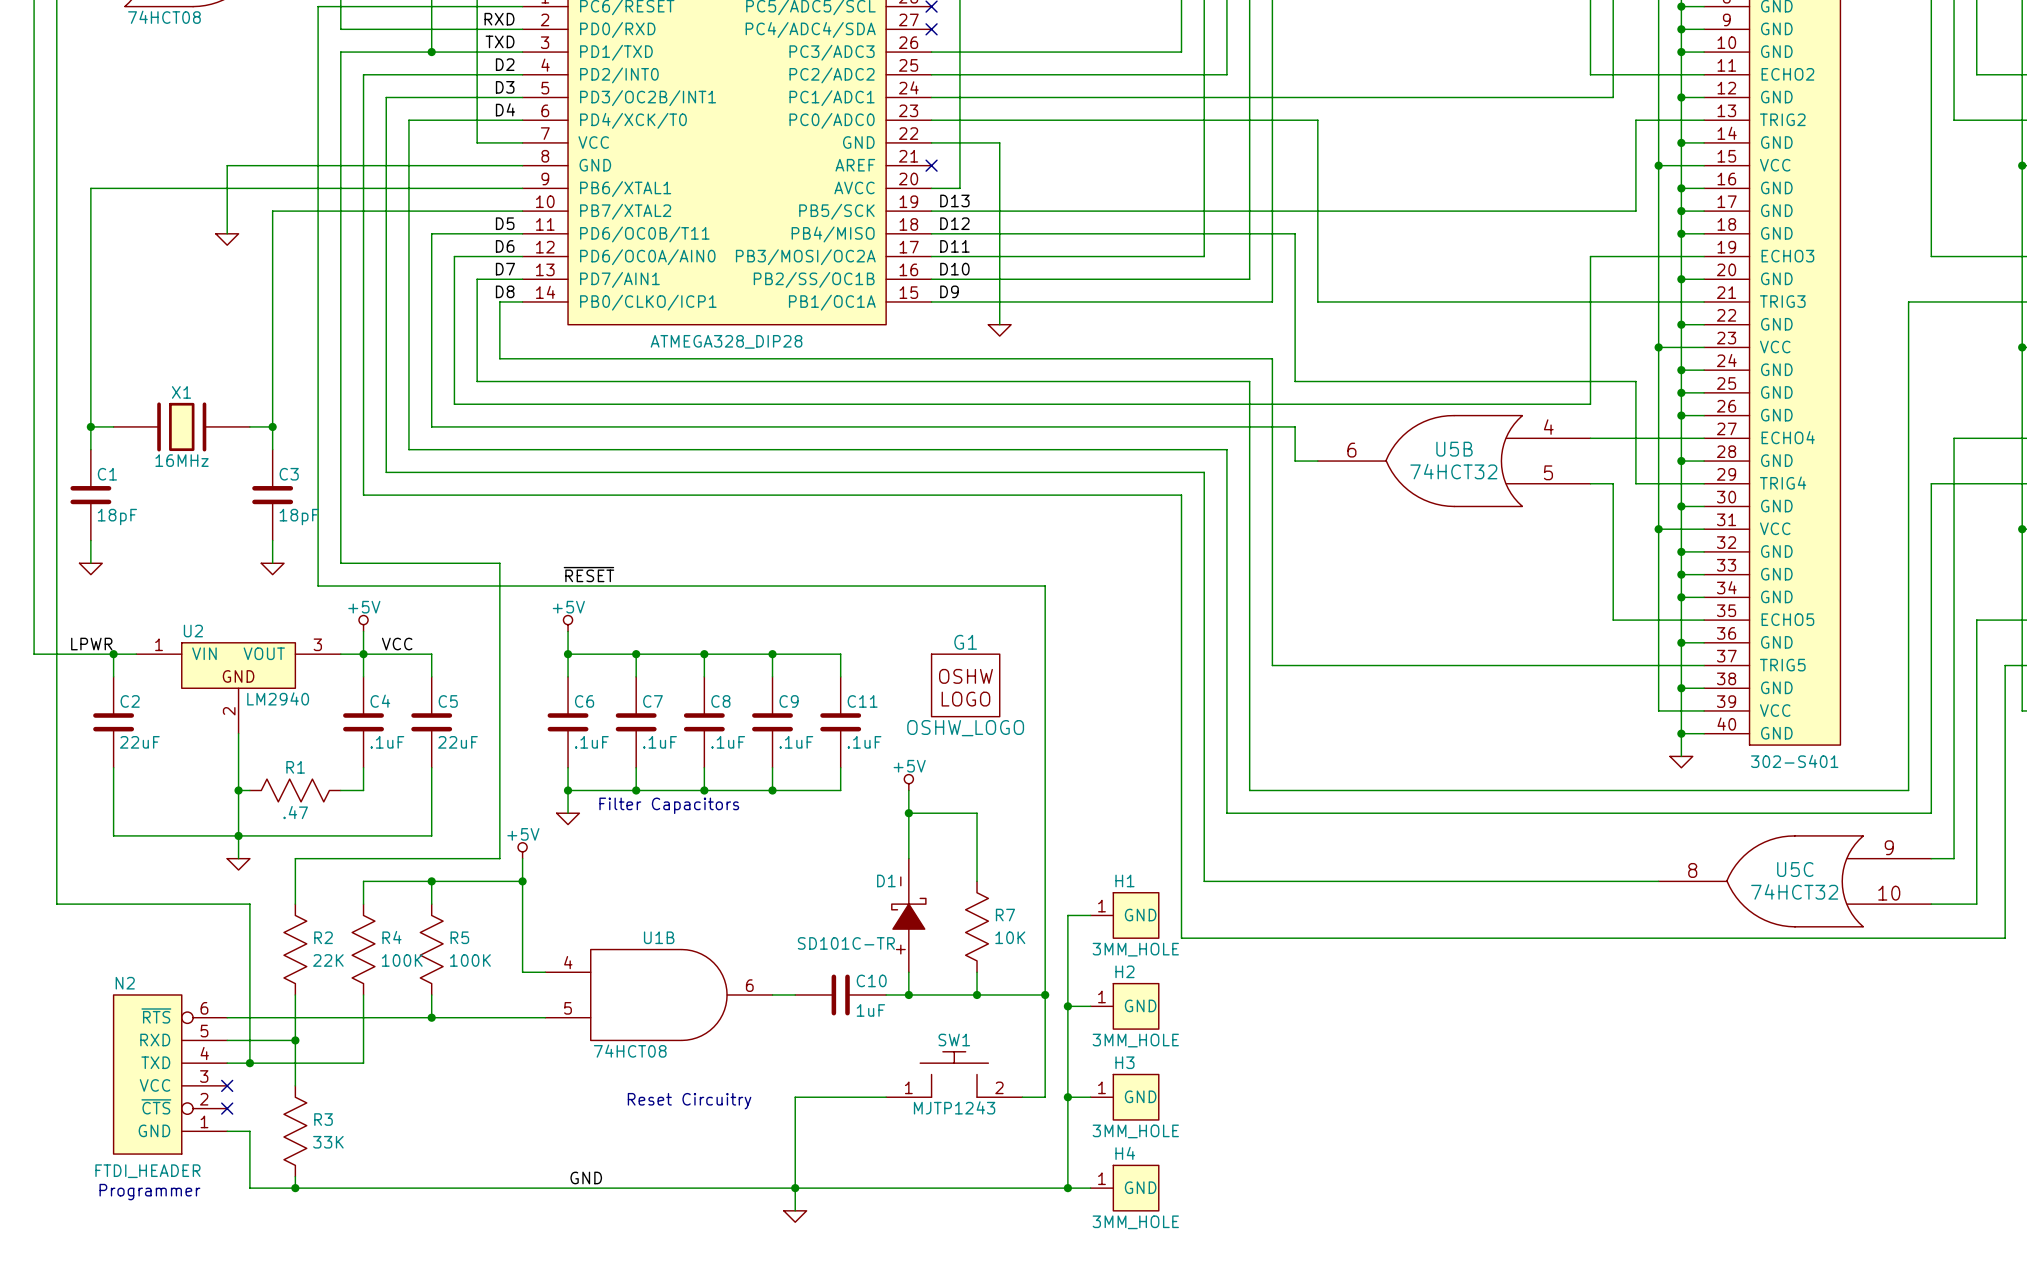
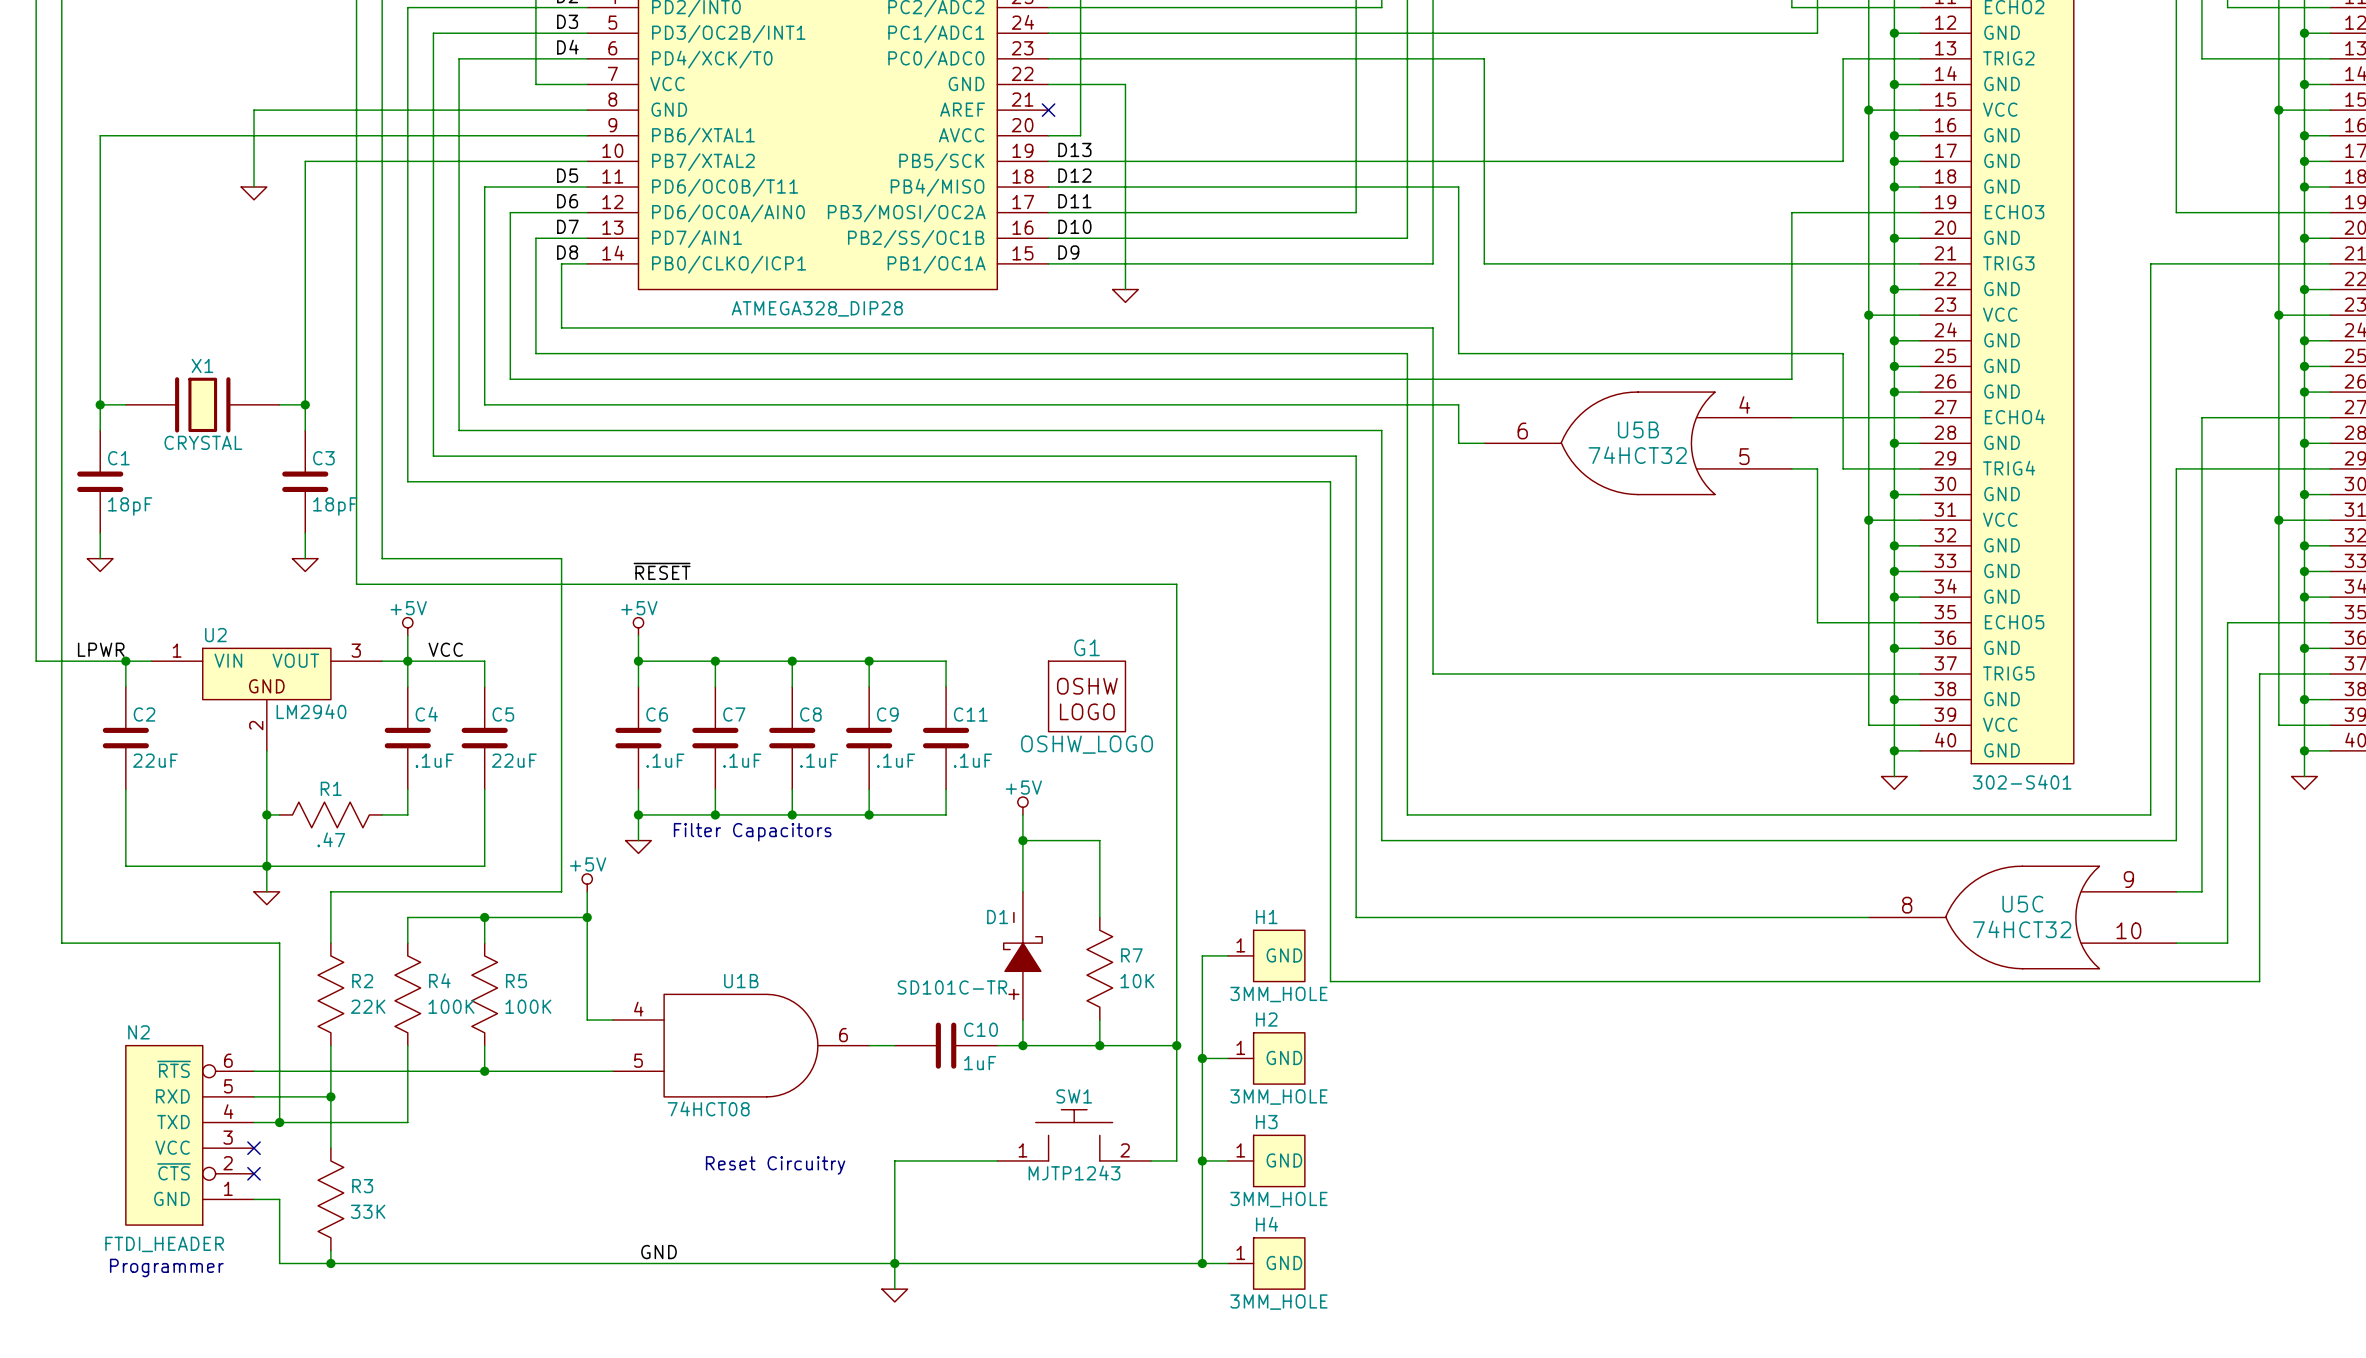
X1 value: 16MHz (182, 460) -> CRYSTAL (203, 442)

